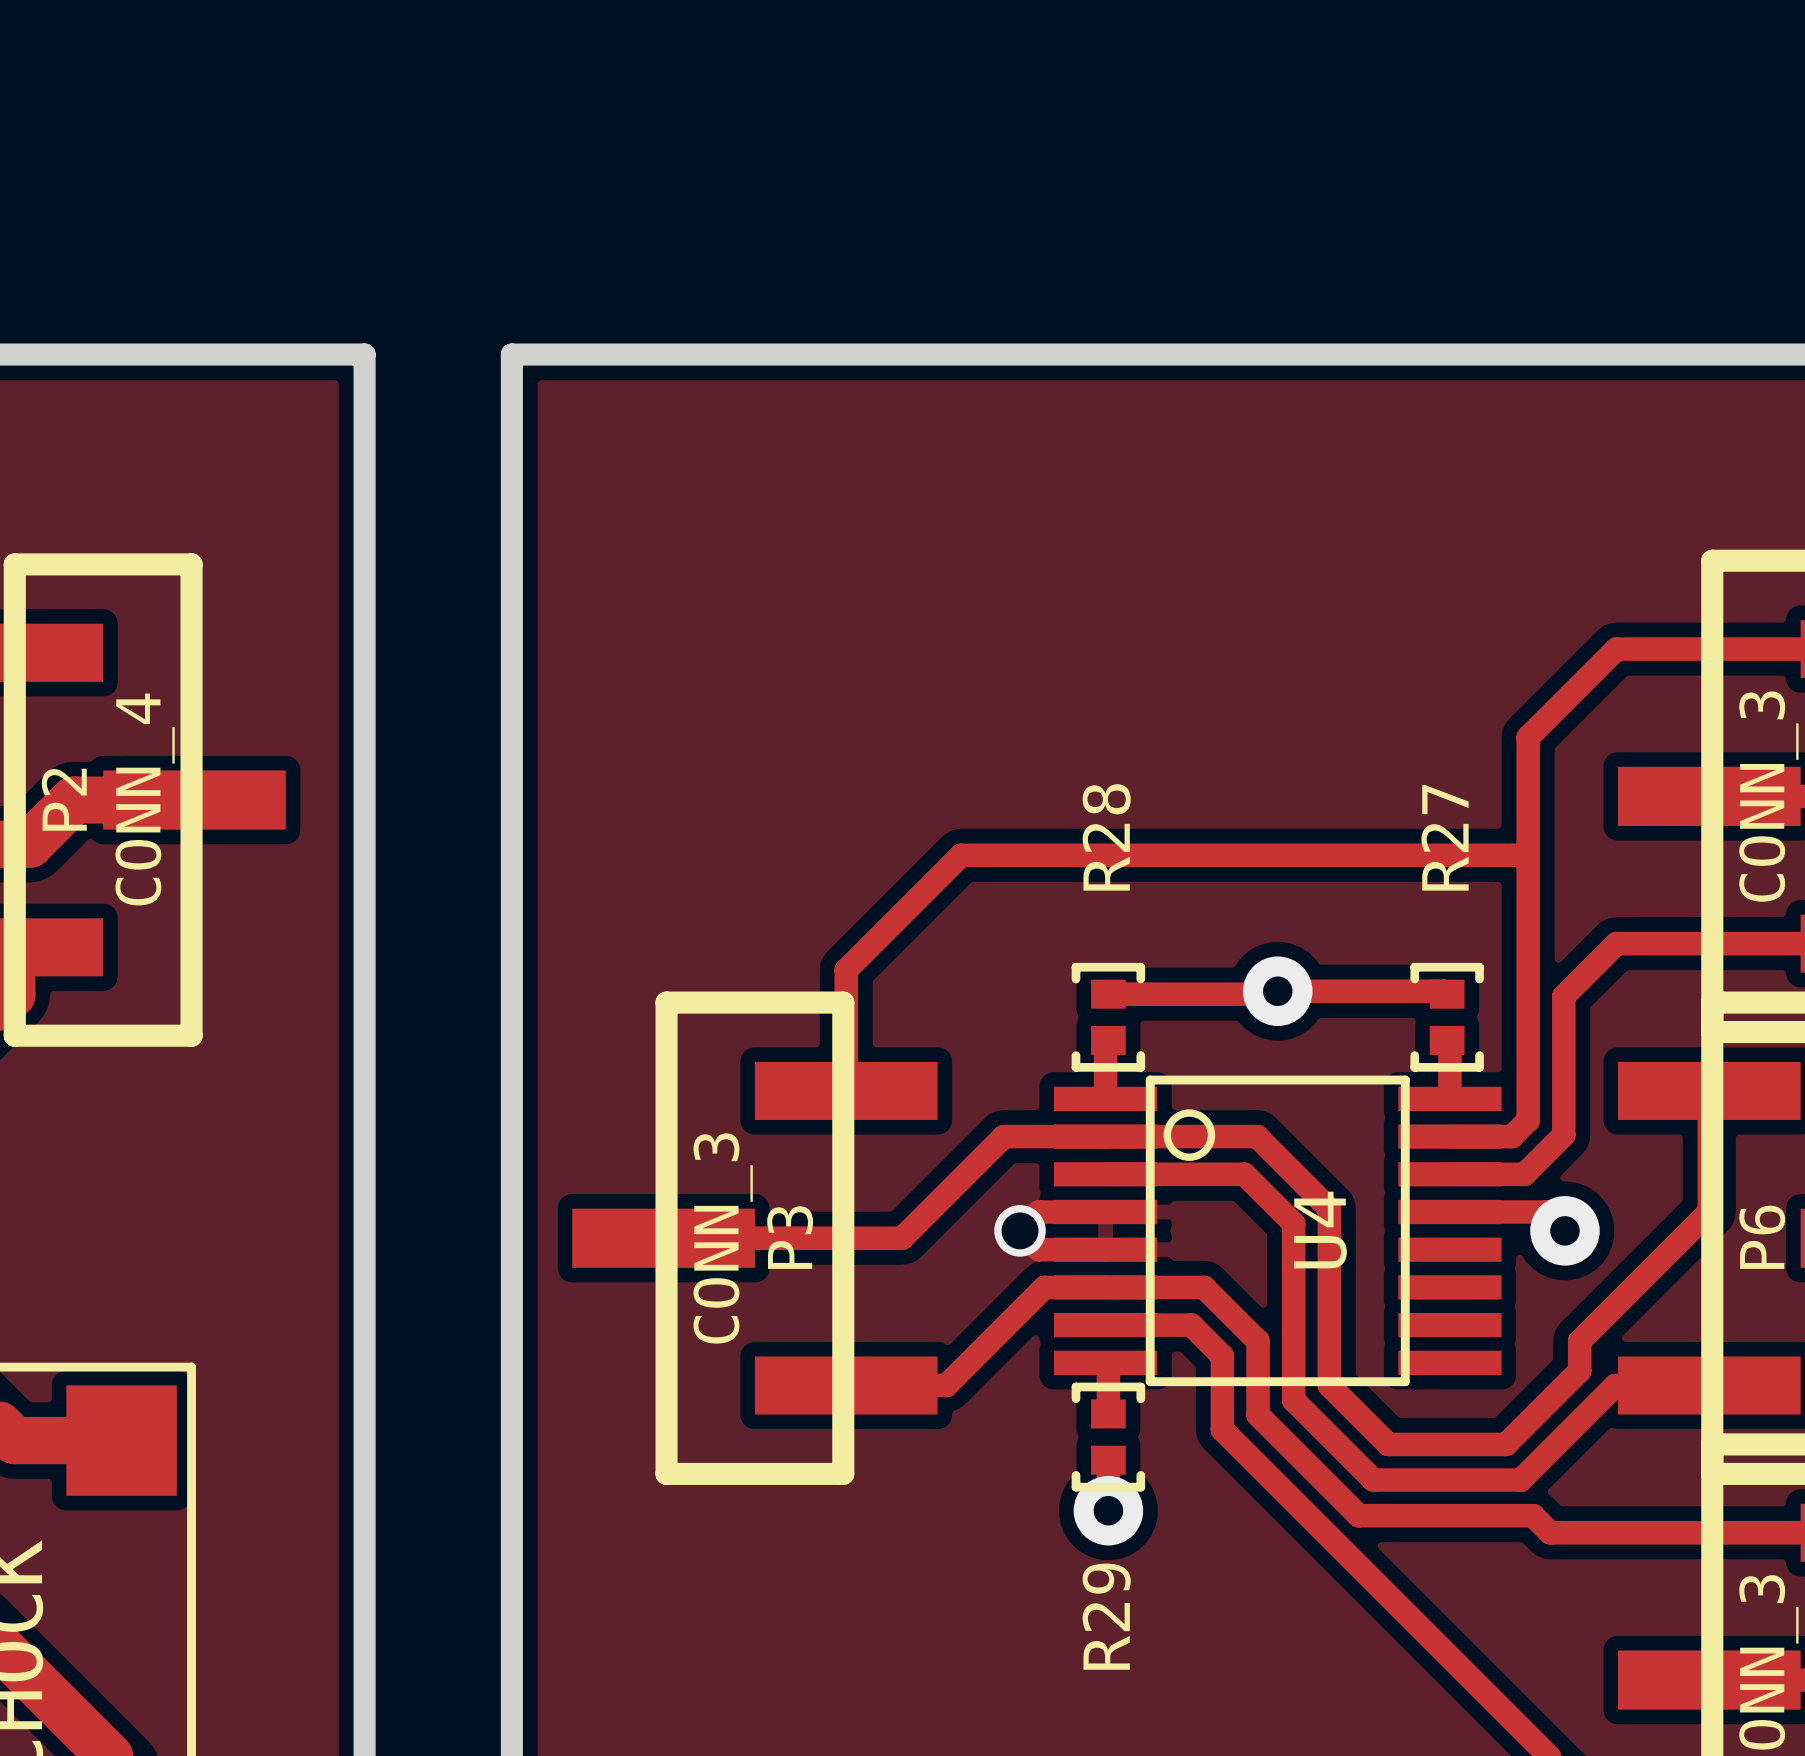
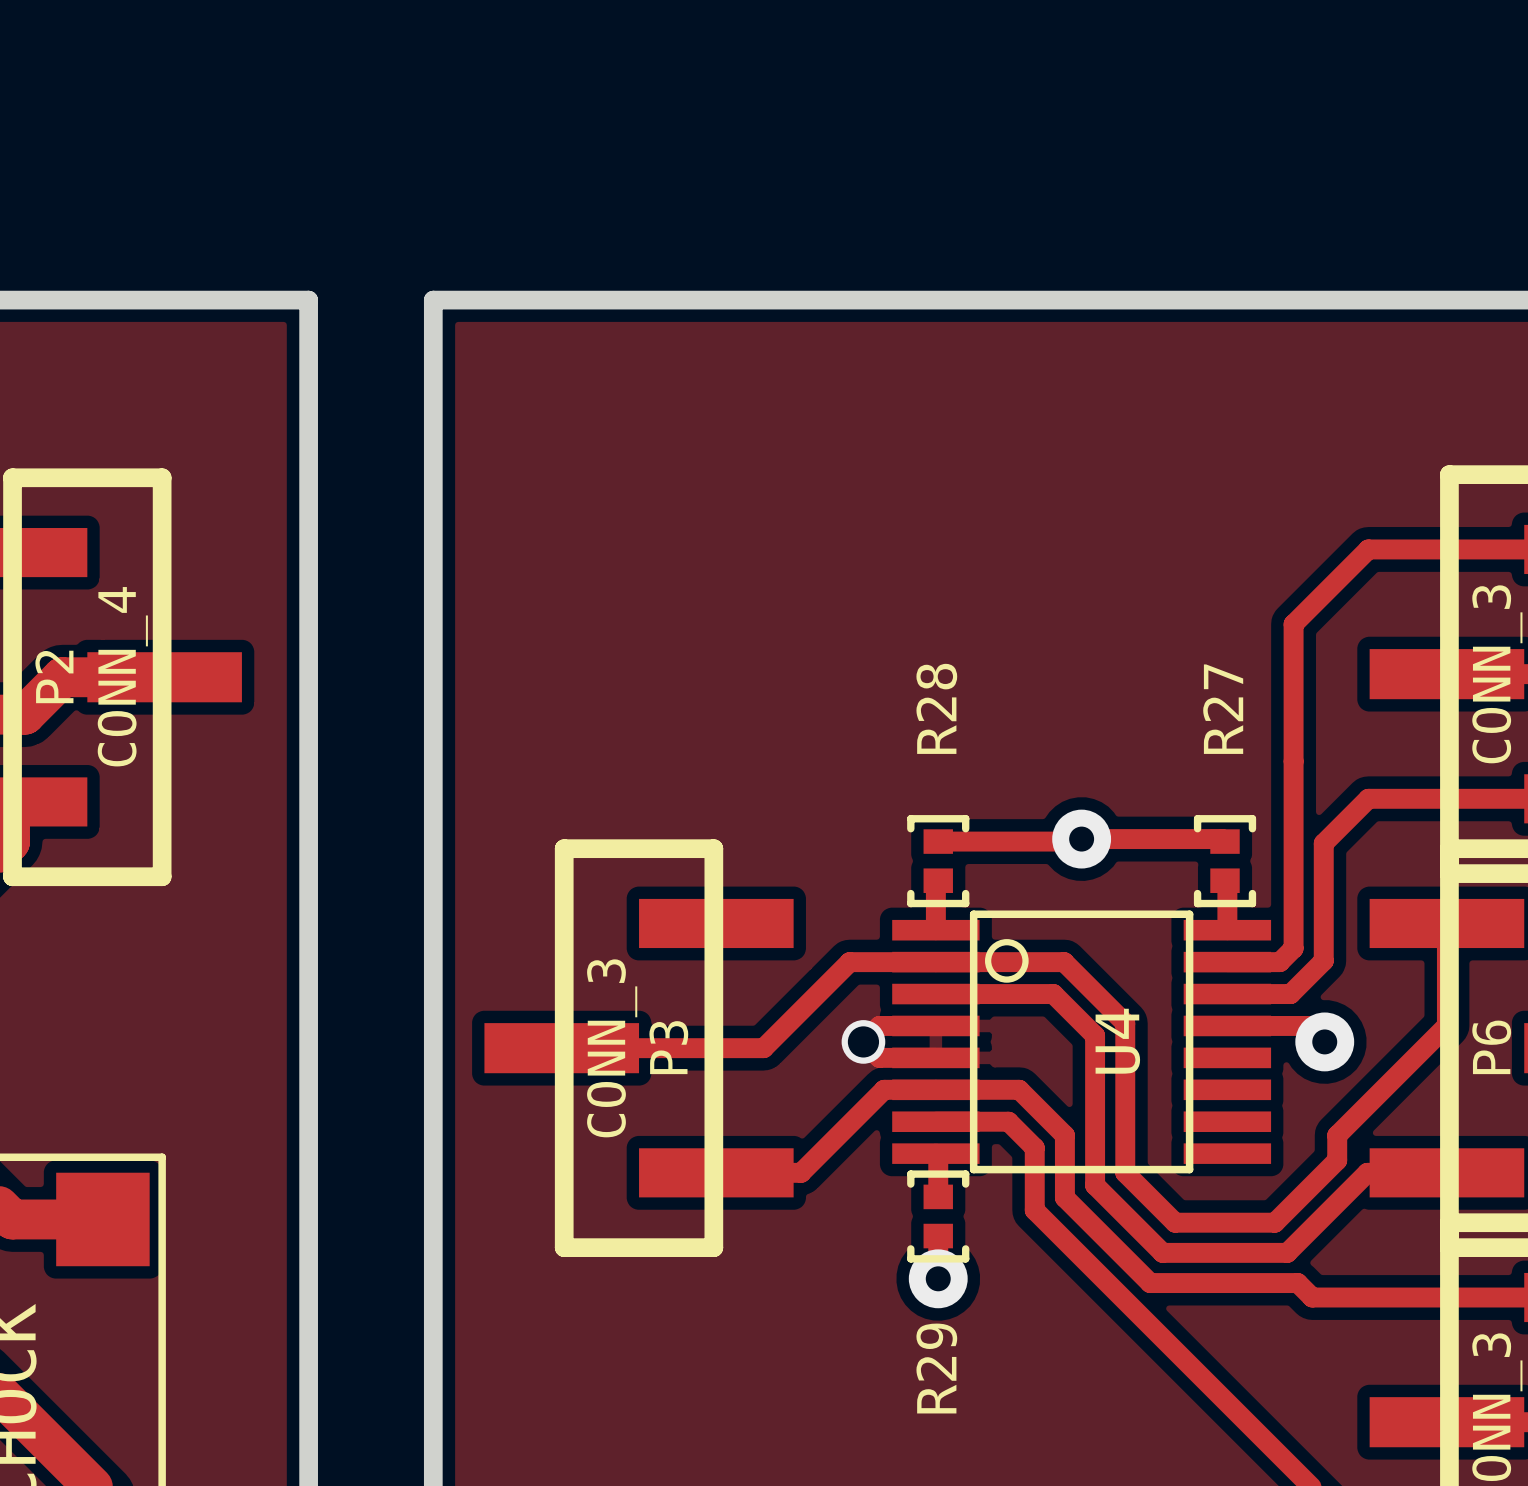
track: (1528, 855) (961, 855) (846, 970) (846, 1090) -> none

